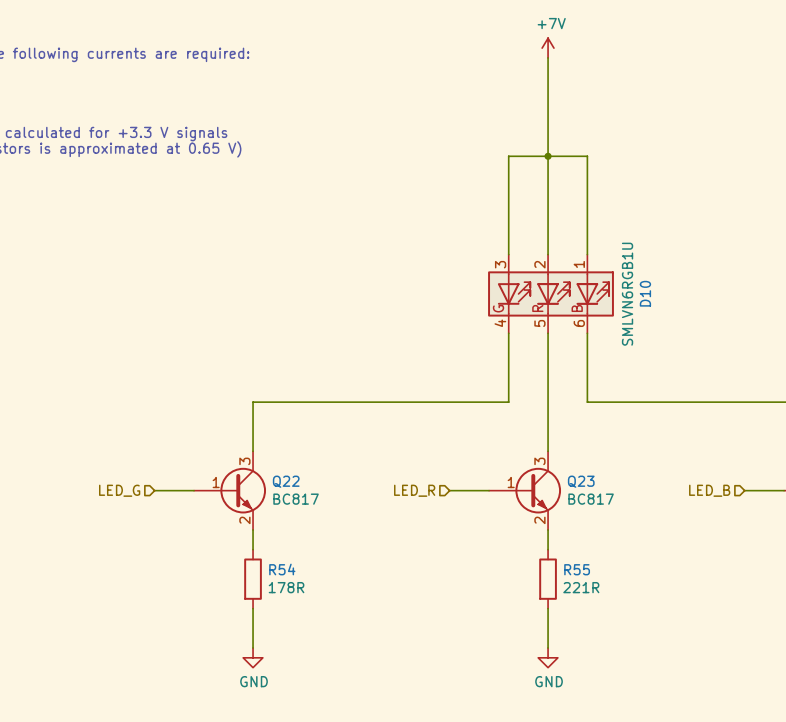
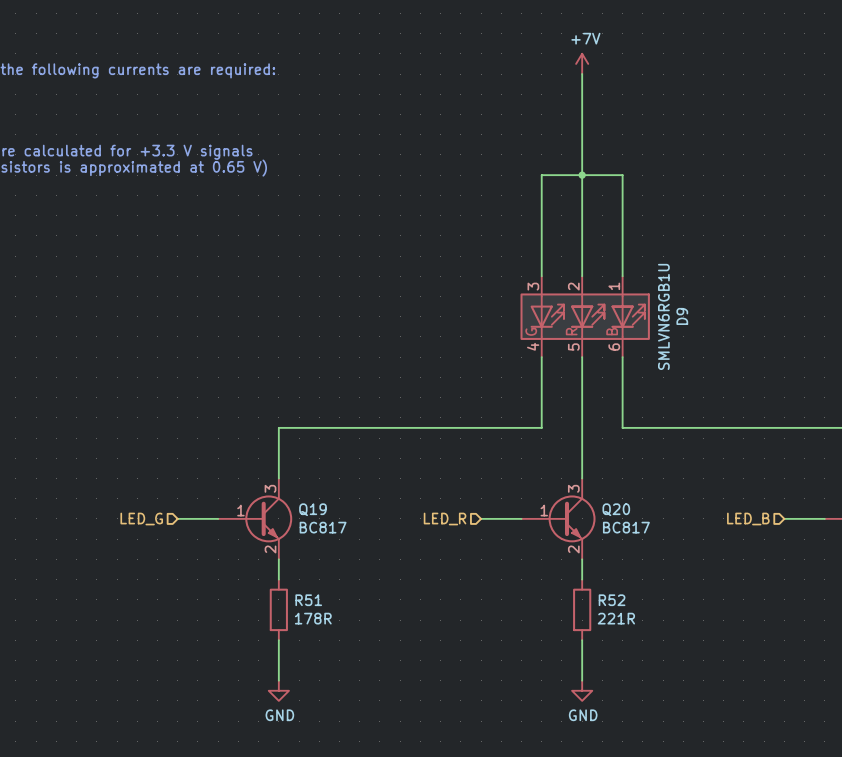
D10 name: D10 (645, 293) -> D9 (682, 316)
Q22 name: Q22 (286, 481) -> Q19 (312, 509)
Q23 name: Q23 (581, 481) -> Q20 (616, 509)
R54 name: R54 (282, 569) -> R51 (308, 600)
R55 name: R55 (577, 569) -> R52 (612, 600)

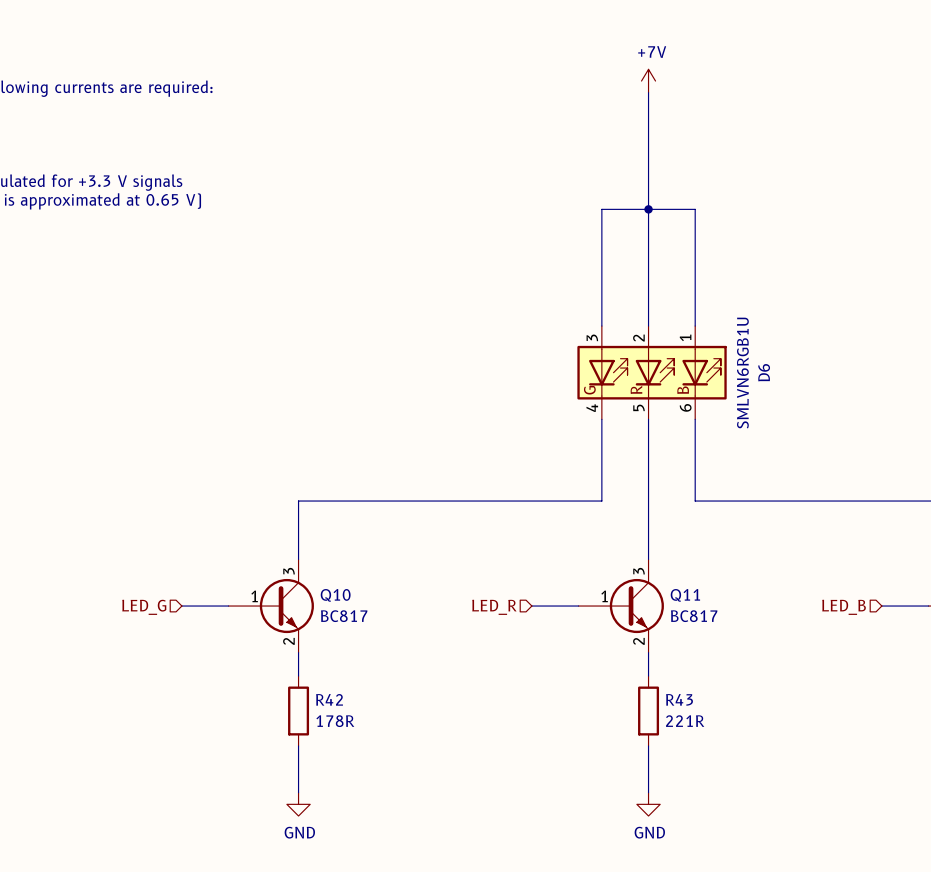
D9 name: D9 (682, 316) -> D6 (764, 372)
Q19 name: Q19 (312, 509) -> Q10 (335, 595)
Q20 name: Q20 (616, 509) -> Q11 (685, 595)
R51 name: R51 (308, 600) -> R42 (329, 699)
R52 name: R52 (612, 600) -> R43 (679, 699)

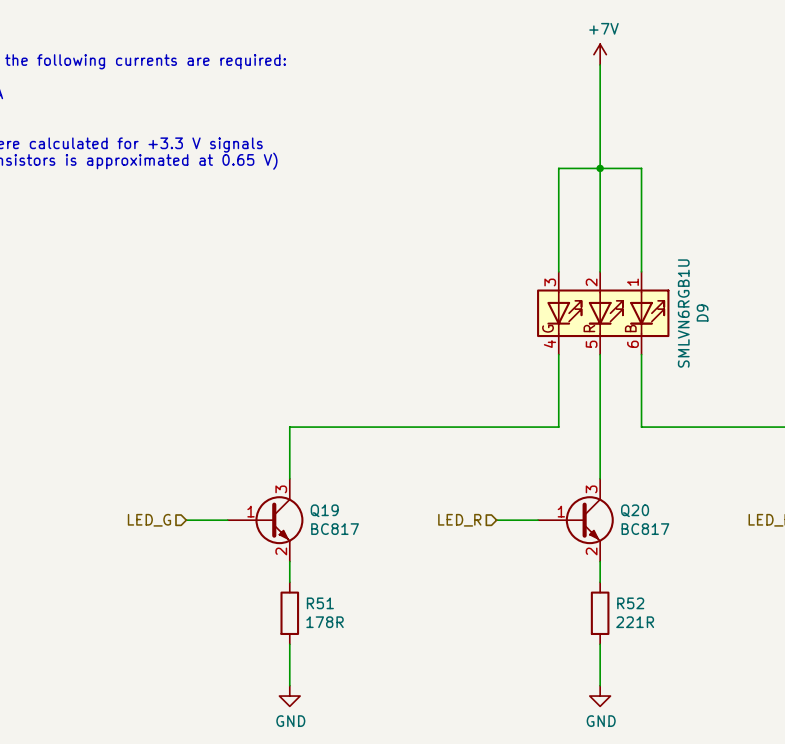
D6 name: D6 (764, 372) -> D9 (702, 313)
Q10 name: Q10 (335, 595) -> Q19 (324, 510)
Q11 name: Q11 (685, 595) -> Q20 (635, 510)
R42 name: R42 (329, 699) -> R51 (320, 603)
R43 name: R43 (679, 699) -> R52 (630, 603)

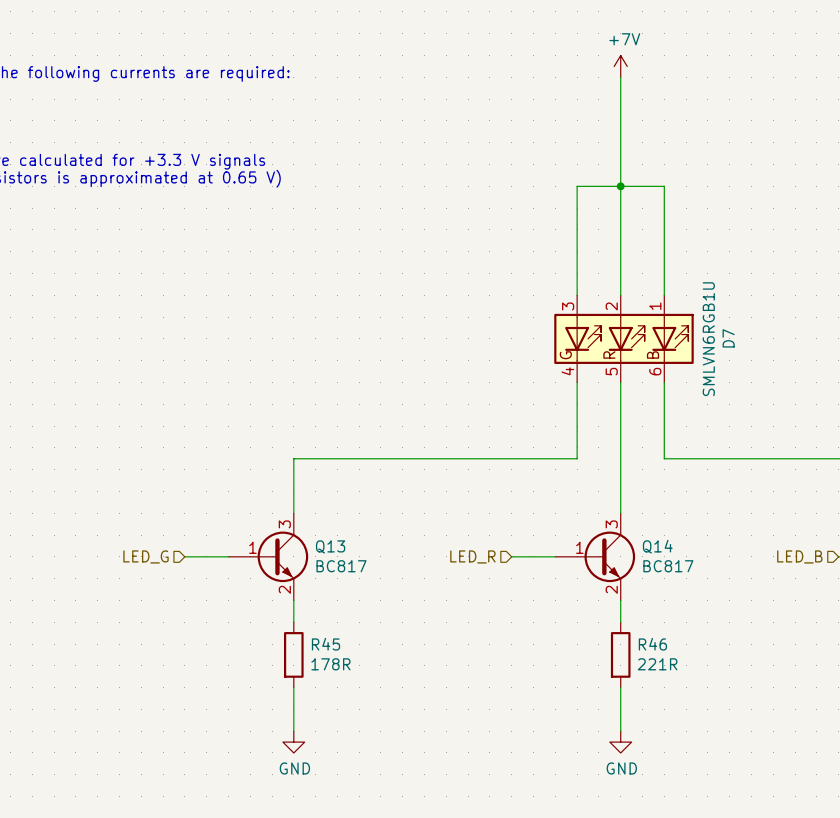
D9 name: D9 (702, 313) -> D7 (728, 338)
Q19 name: Q19 (324, 510) -> Q13 (330, 546)
Q20 name: Q20 (635, 510) -> Q14 (657, 546)
R51 name: R51 (320, 603) -> R45 (326, 644)
R52 name: R52 (630, 603) -> R46 (652, 644)

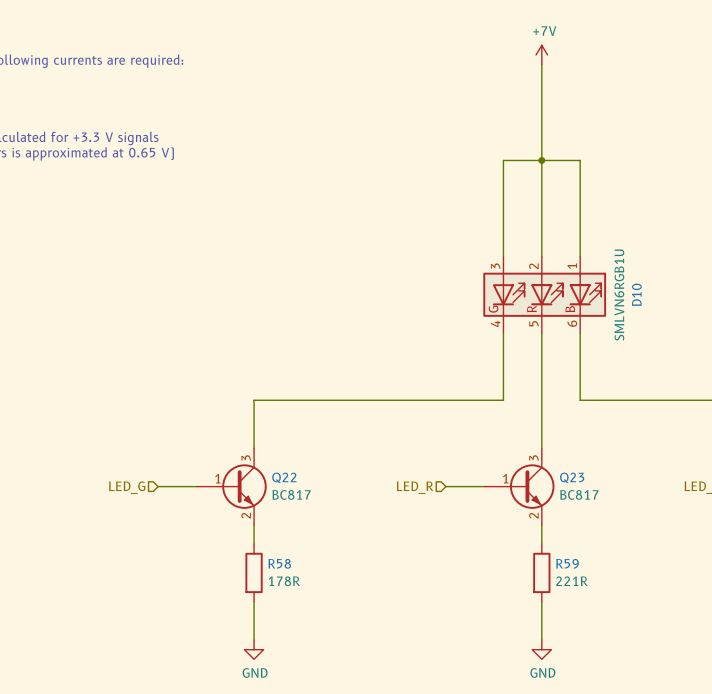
D7 name: D7 (728, 338) -> D10 (636, 294)
Q13 name: Q13 (330, 546) -> Q22 (284, 477)
Q14 name: Q14 (657, 546) -> Q23 (572, 477)
R45 name: R45 (326, 644) -> R58 (279, 563)
R46 name: R46 (652, 644) -> R59 (567, 563)

